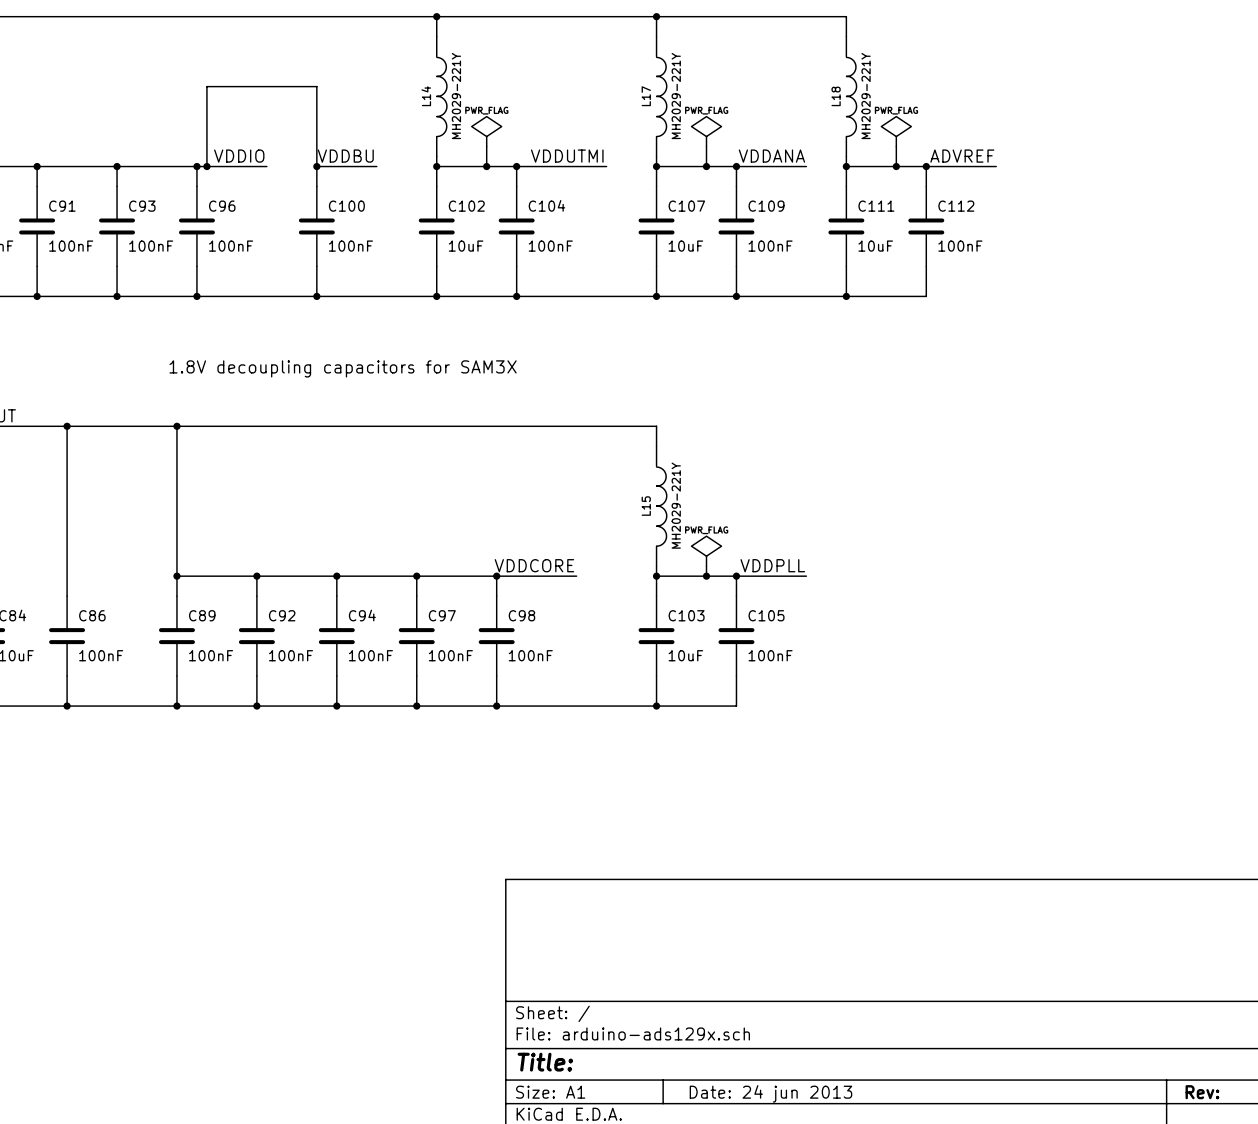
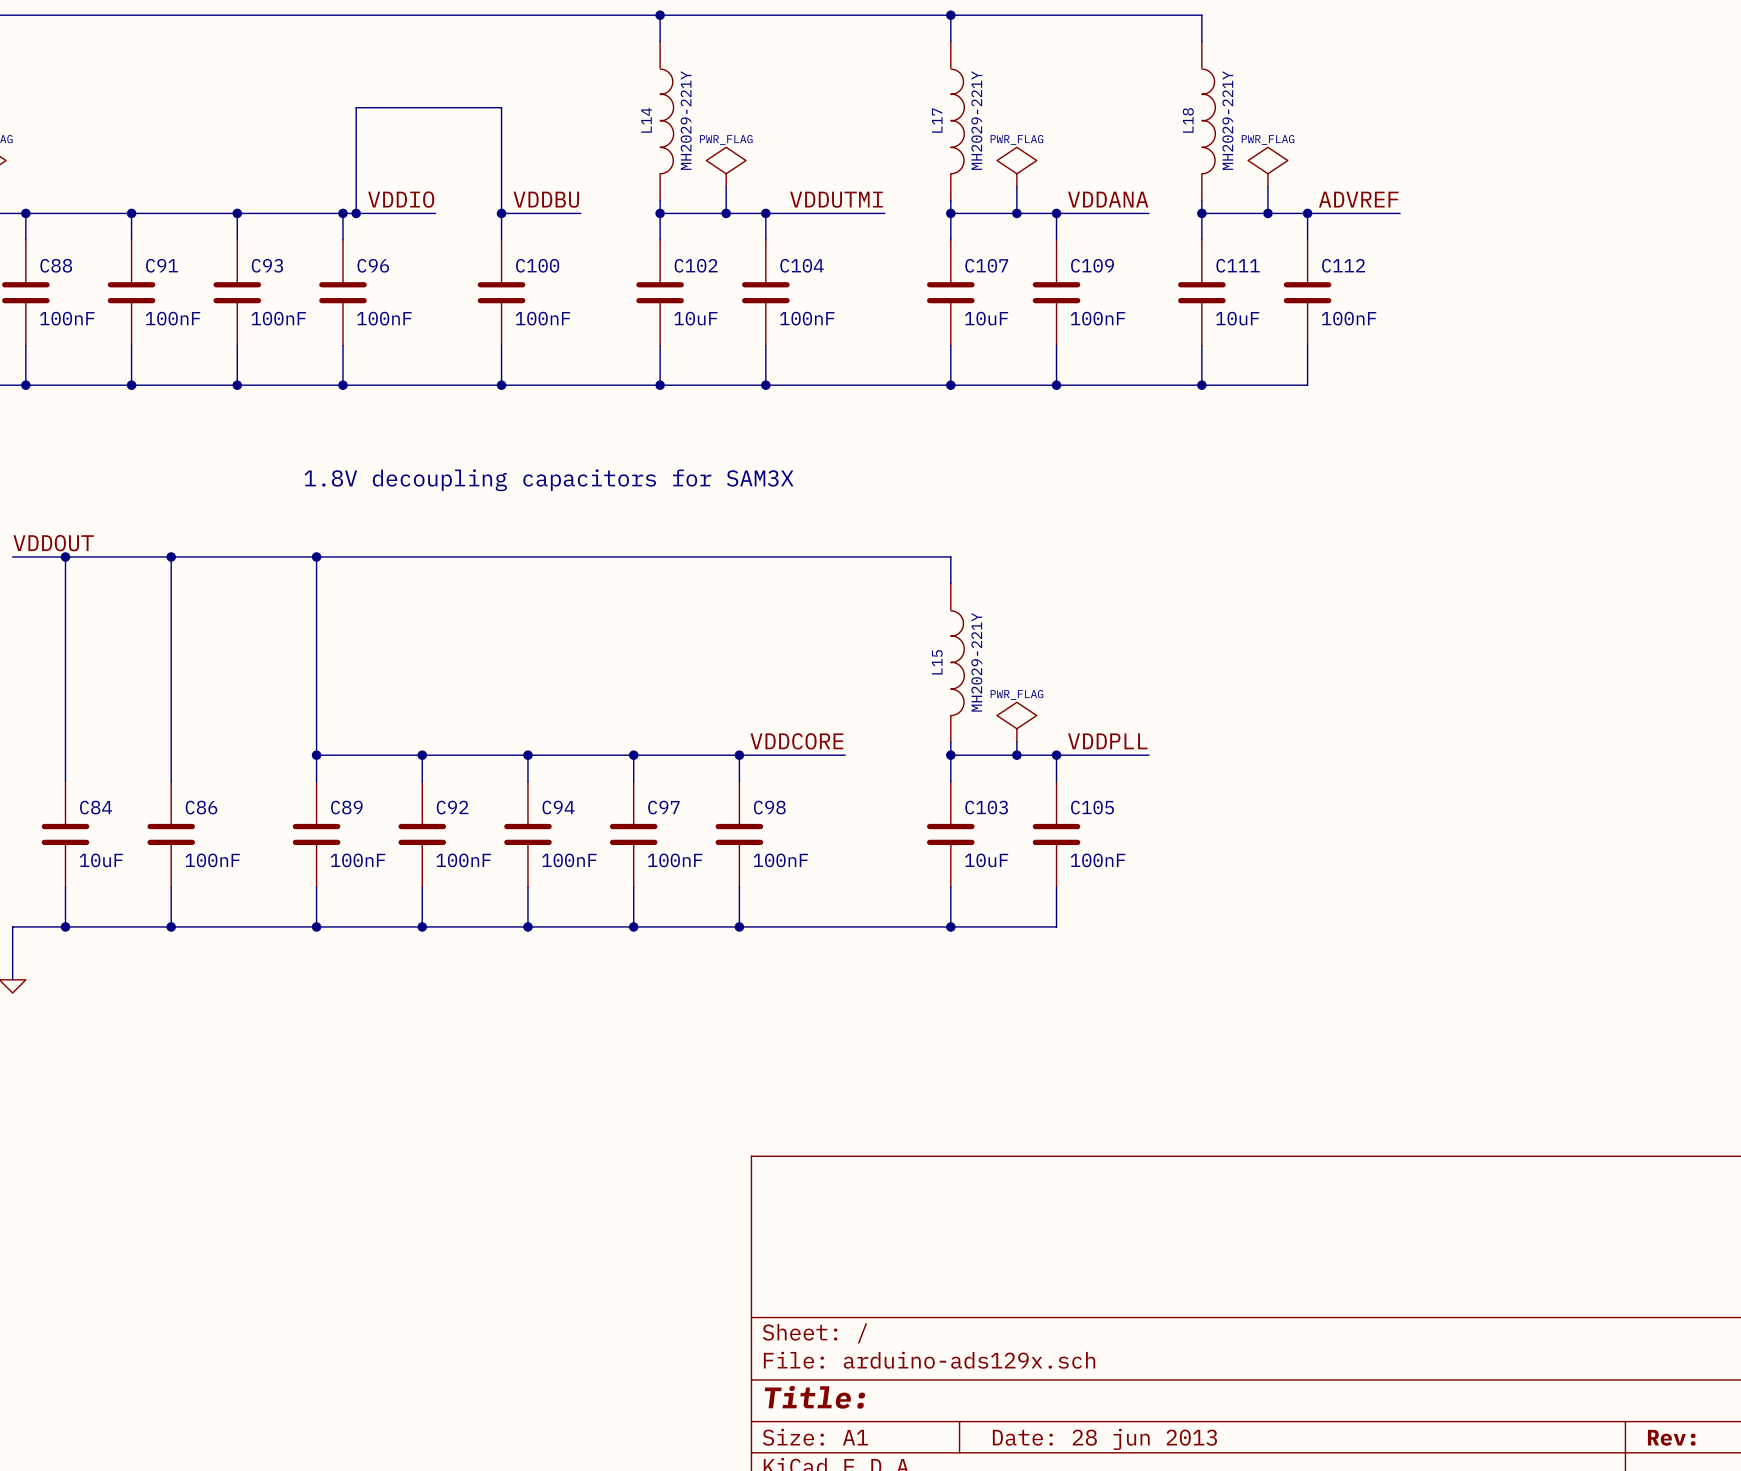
title block: Date: 24 jun 2013 (770, 1093) -> Date: 28 jun 2013 (1104, 1439)

